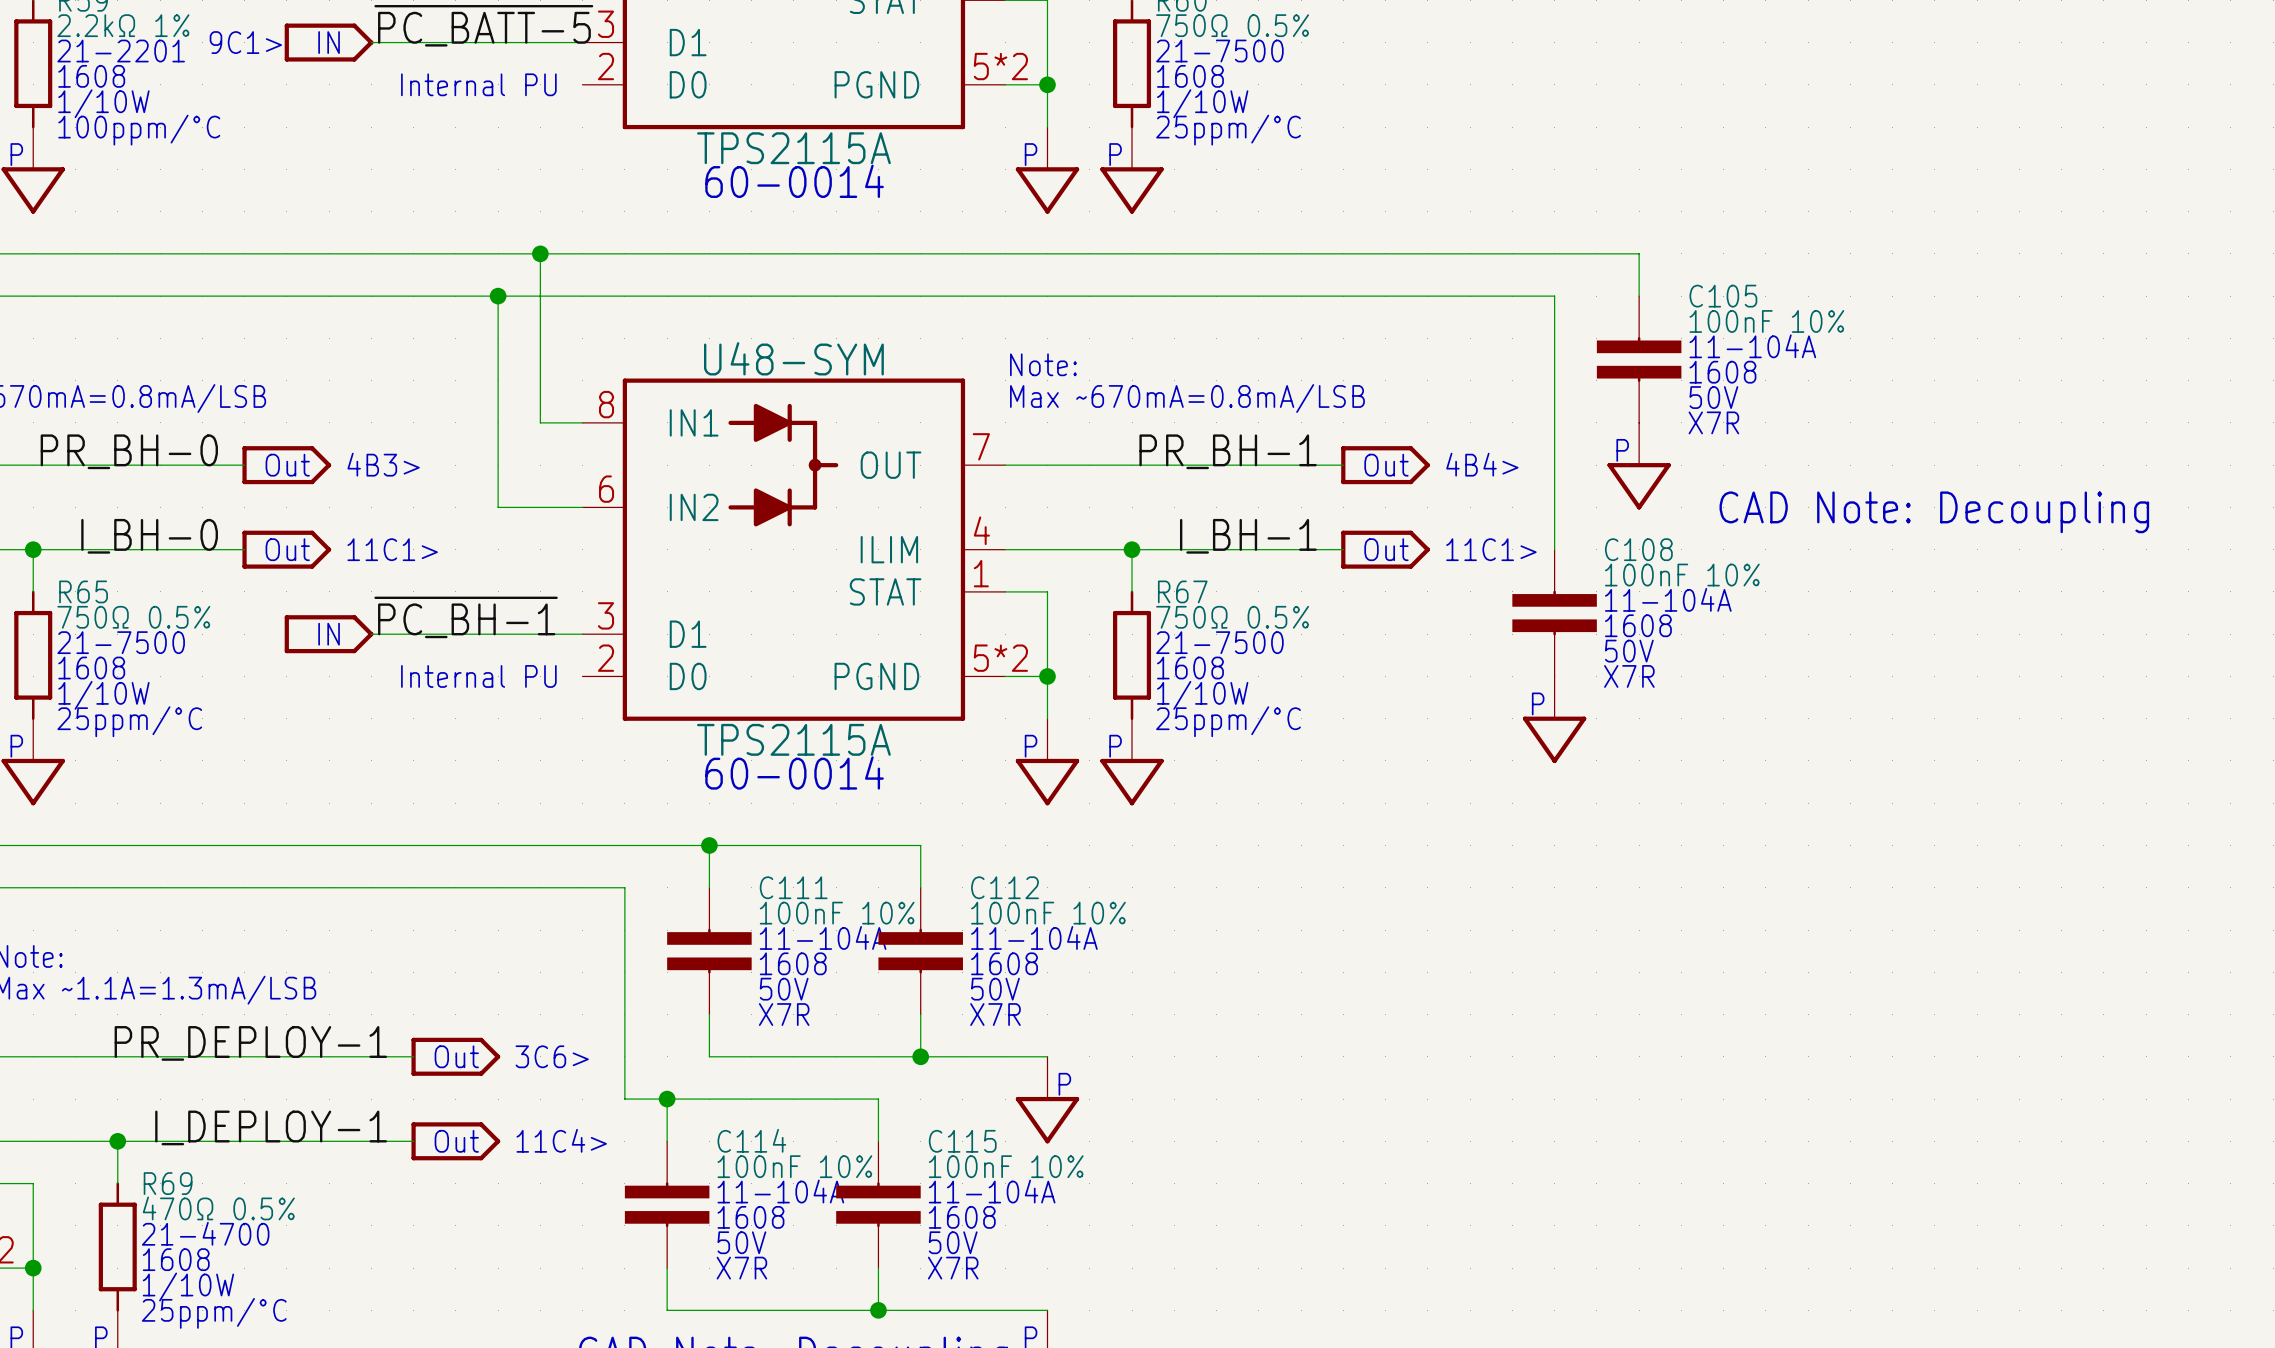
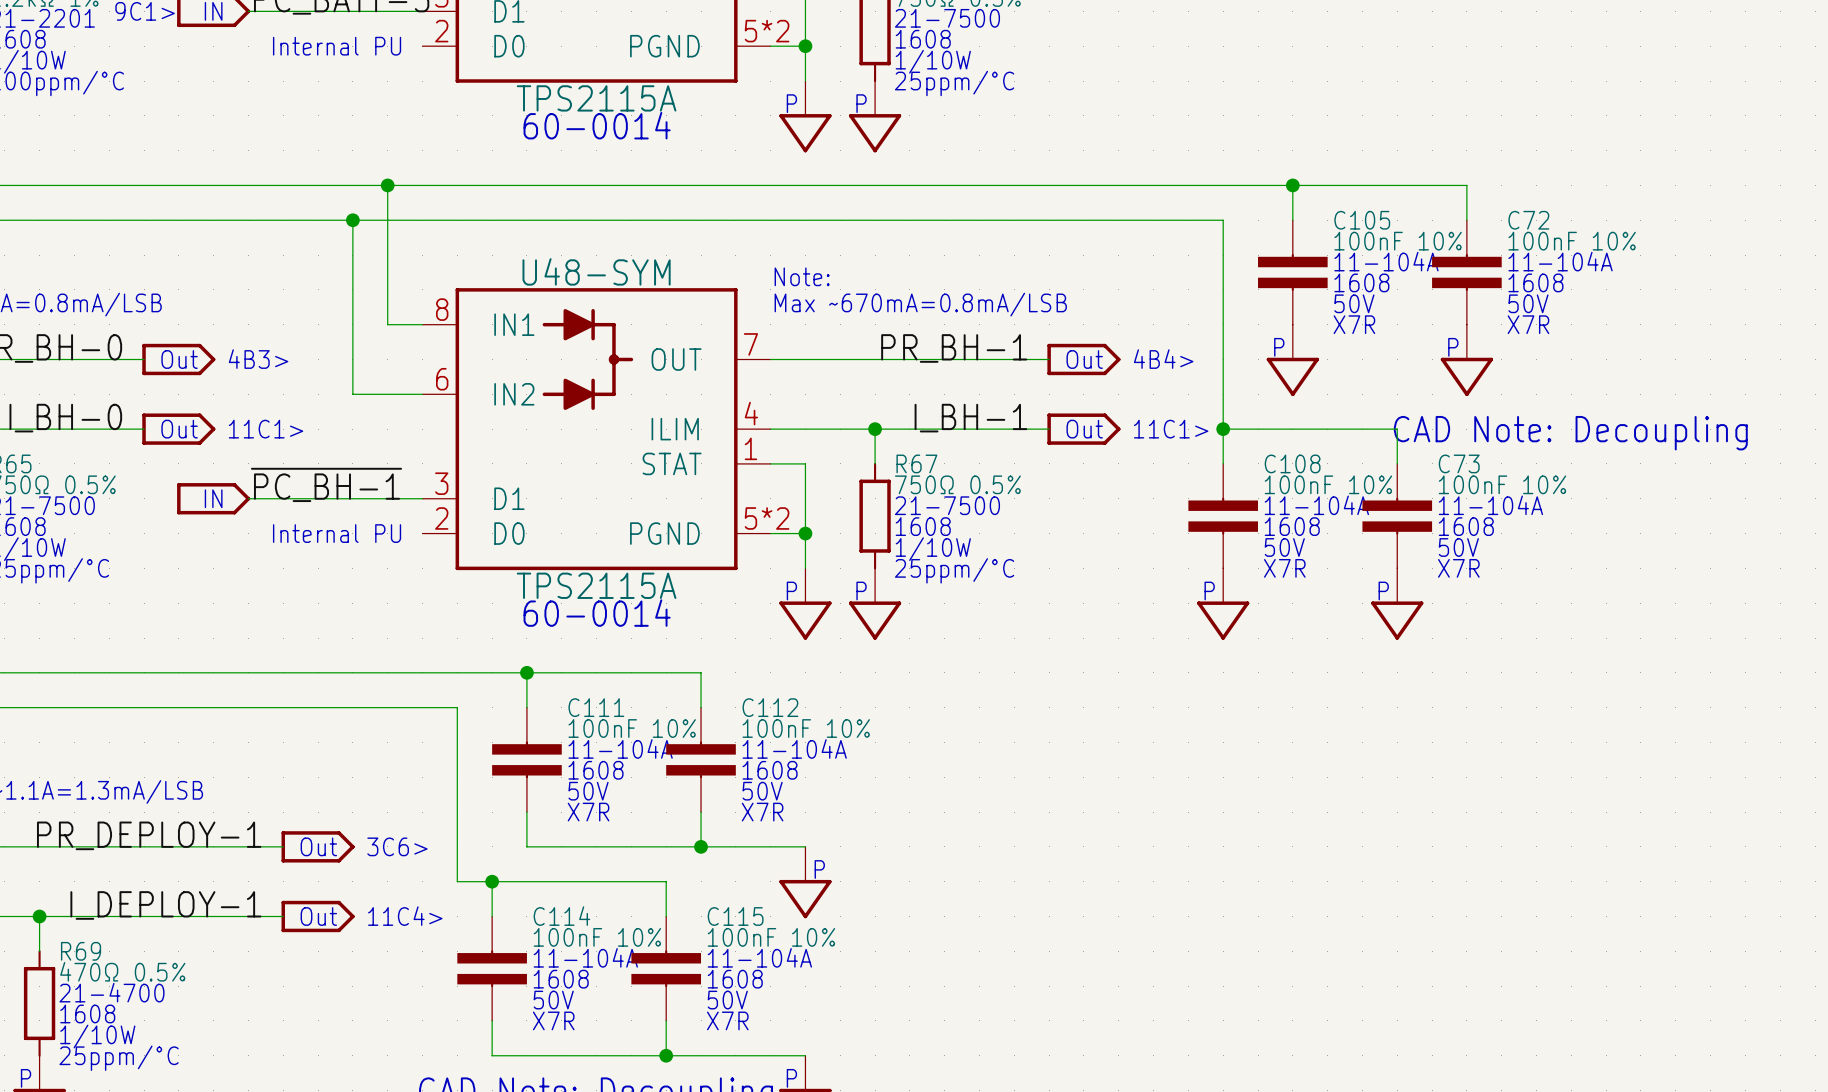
wire: none -> (1292, 185) (1466, 185) (1466, 220)
junction: none -> (1292, 185)
C72: none -> 100nF 10% (1466, 272)
power symbol: none -> (1466, 360)
text position: CAD Note: Decoupling (1934, 512) -> CAD Note: Decoupling (1570, 433)
junction: none -> (1223, 429)
wire: none -> (1223, 463) (1223, 429) (1397, 429) (1397, 463)
C108 position: (1554, 613) -> (1223, 516)
C73: none -> 100nF 10% (1397, 516)
power symbol position: (1554, 719) -> (1223, 604)
power symbol: none -> (1397, 604)

